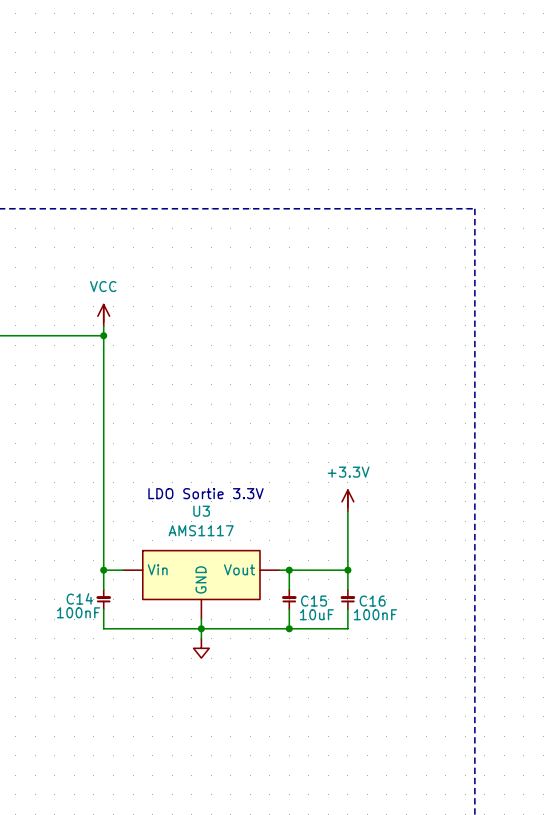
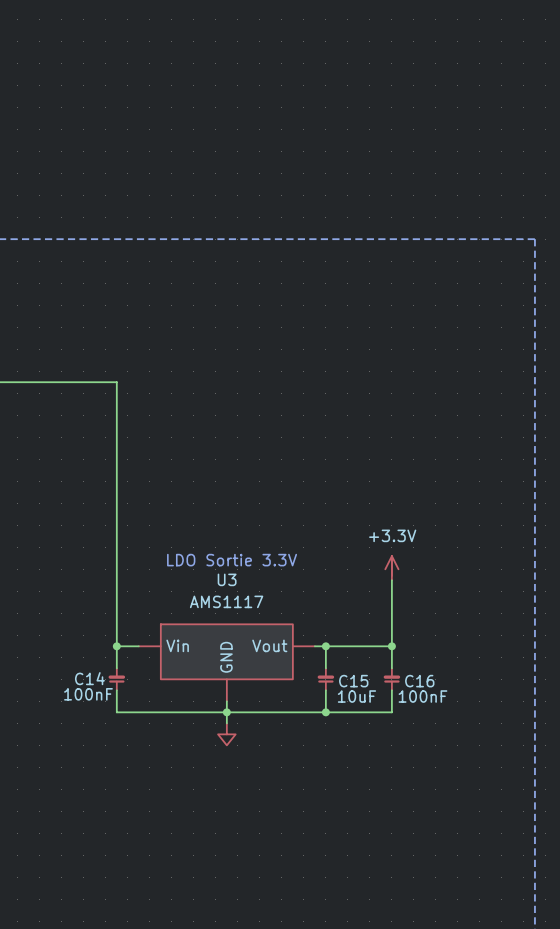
power symbol: VCC (103, 315) -> none
wire: (103, 325) (103, 335) -> none
junction: (103, 335) -> none

